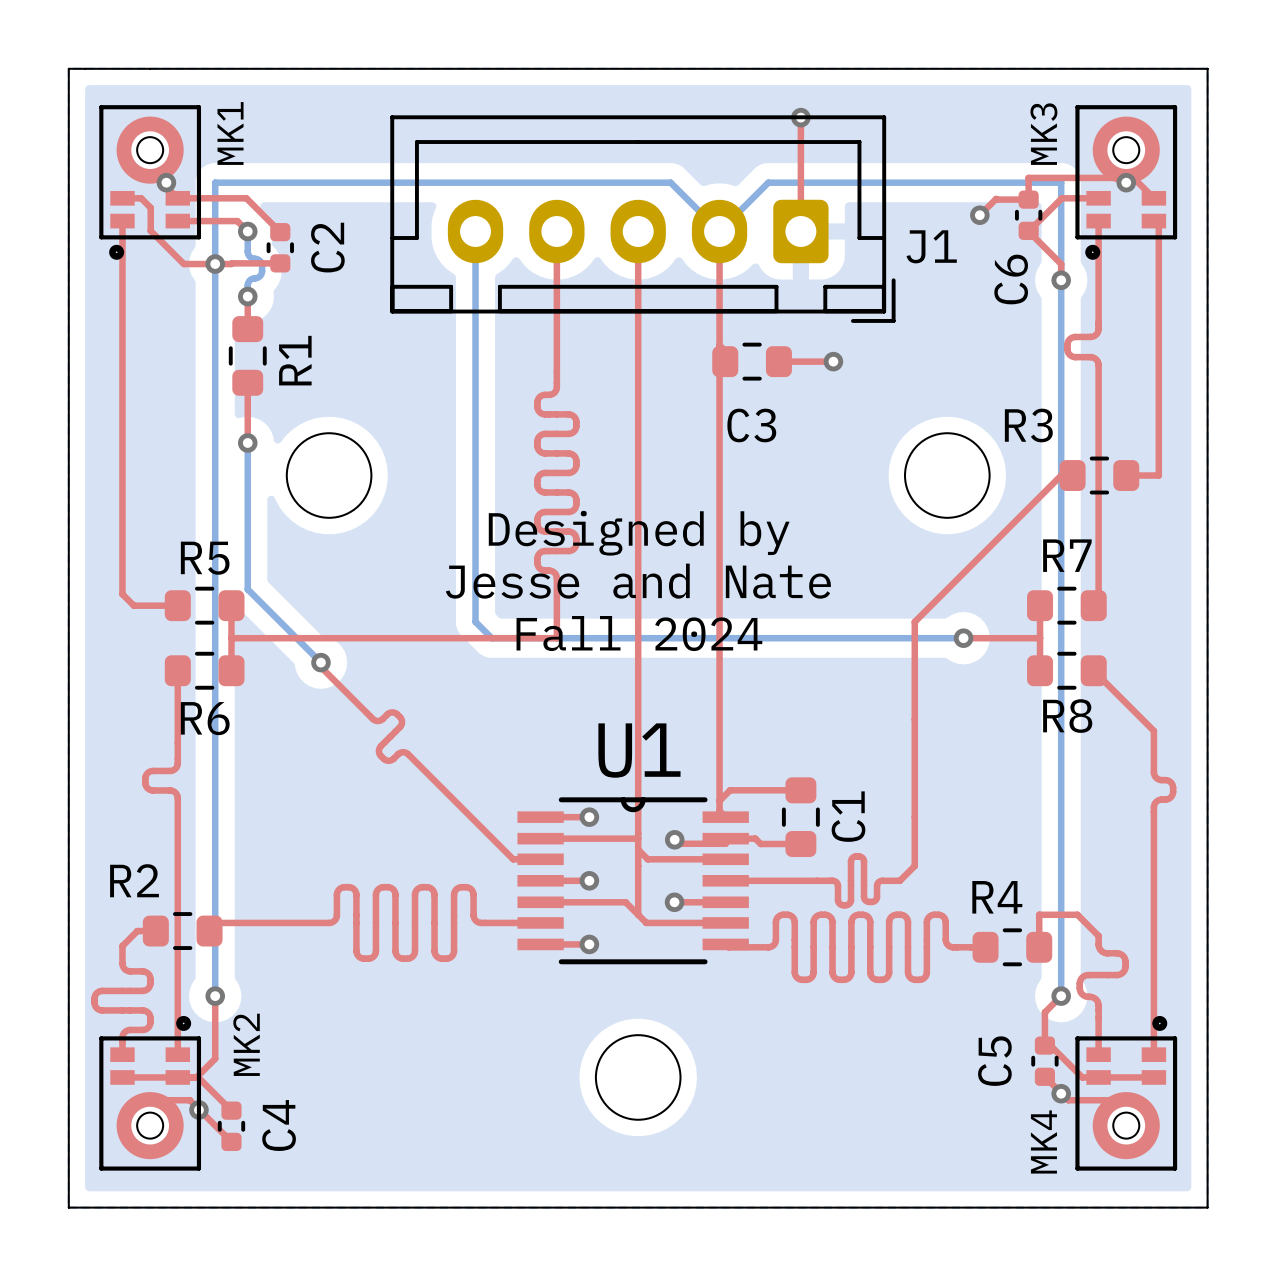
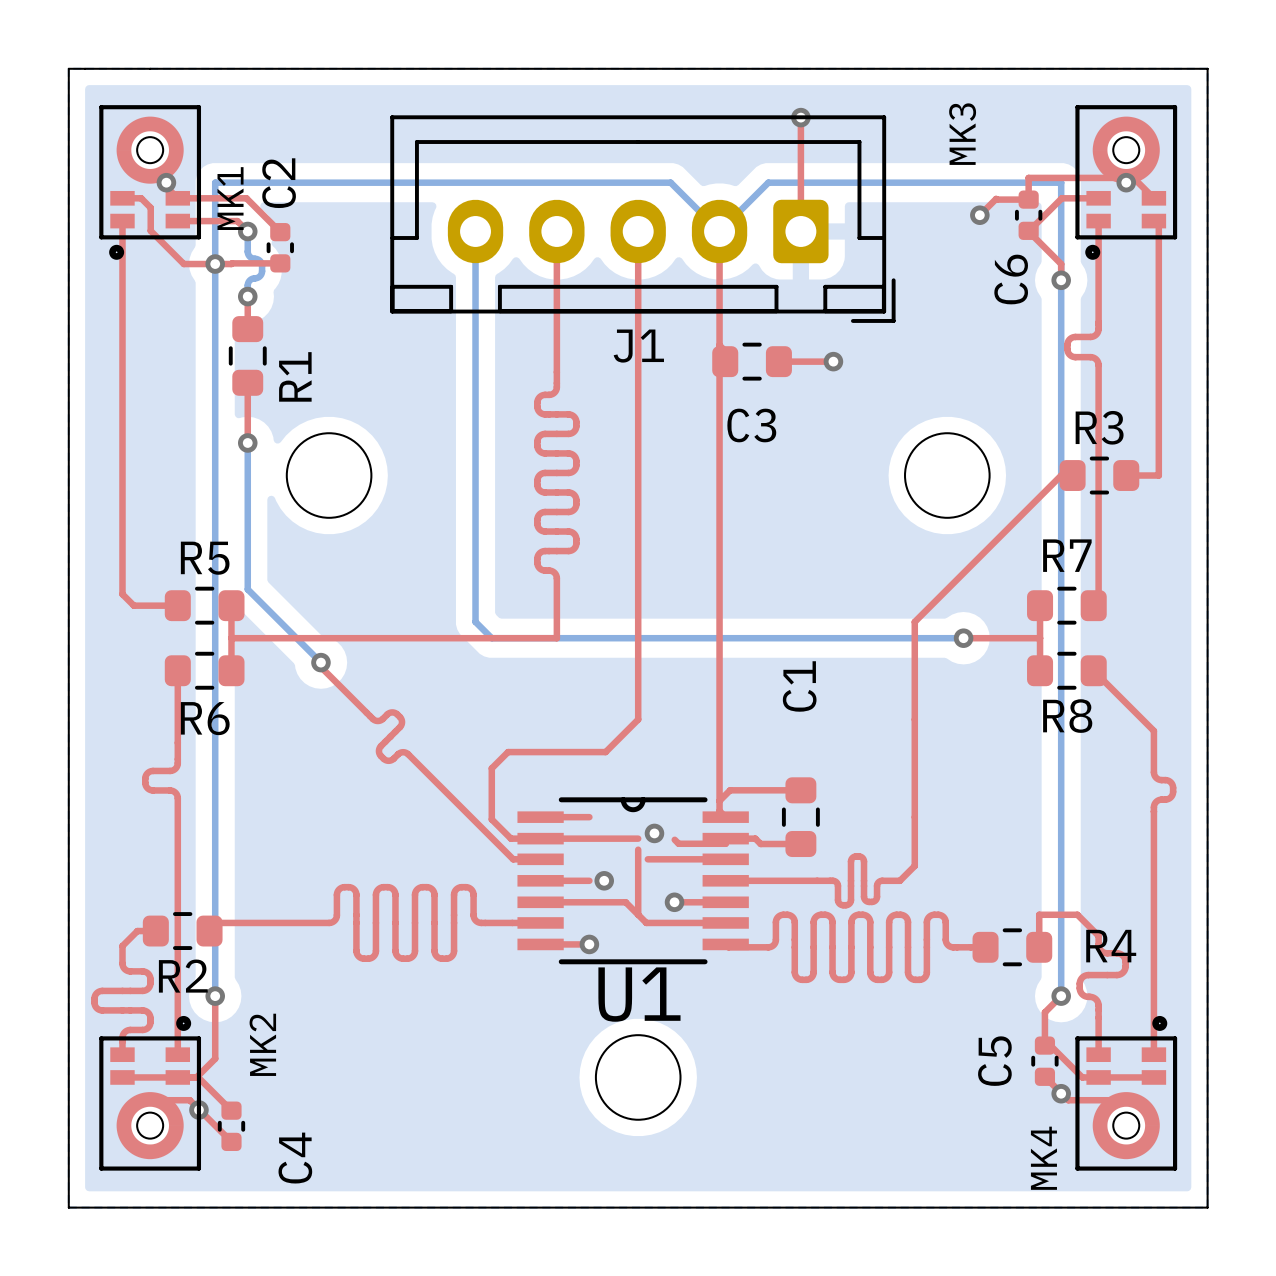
MK1 name position: MK1 (230, 133) -> MK1 (230, 198)
MK3 name position: MK3 (1043, 134) -> MK3 (962, 134)
J1 name position: J1 (931, 246) -> J1 (638, 346)
C2 name position: C2 (327, 247) -> C2 (279, 183)
R1 name position: R1 (295, 360) -> R1 (295, 376)
R3 name position: R3 (1028, 425) -> R3 (1099, 427)
text: Designed by (639, 533) -> none
text: Jesse and Nate (638, 581) -> none
text: Fall 2024 (639, 633) -> none
top track: (638, 719) (638, 849) (647, 859) -> (638, 719) (605, 752) (508, 752) (491, 768) (491, 819) (510, 838) (540, 838)
U1 name position: U1 (639, 750) -> U1 (639, 994)
C1 name position: C1 (848, 816) -> C1 (799, 686)
via: (589, 817) -> none
via position: (674, 839) -> (654, 833)
R2 name position: R2 (134, 880) -> R2 (183, 976)
via position: (589, 880) -> (604, 880)
R4 name position: R4 (997, 897) -> R4 (1111, 946)
MK2 name position: MK2 (246, 1044) -> MK2 (262, 1044)
C4 name position: C4 (279, 1125) -> C4 (295, 1158)
MK4 name position: MK4 (1043, 1141) -> MK4 (1043, 1158)

